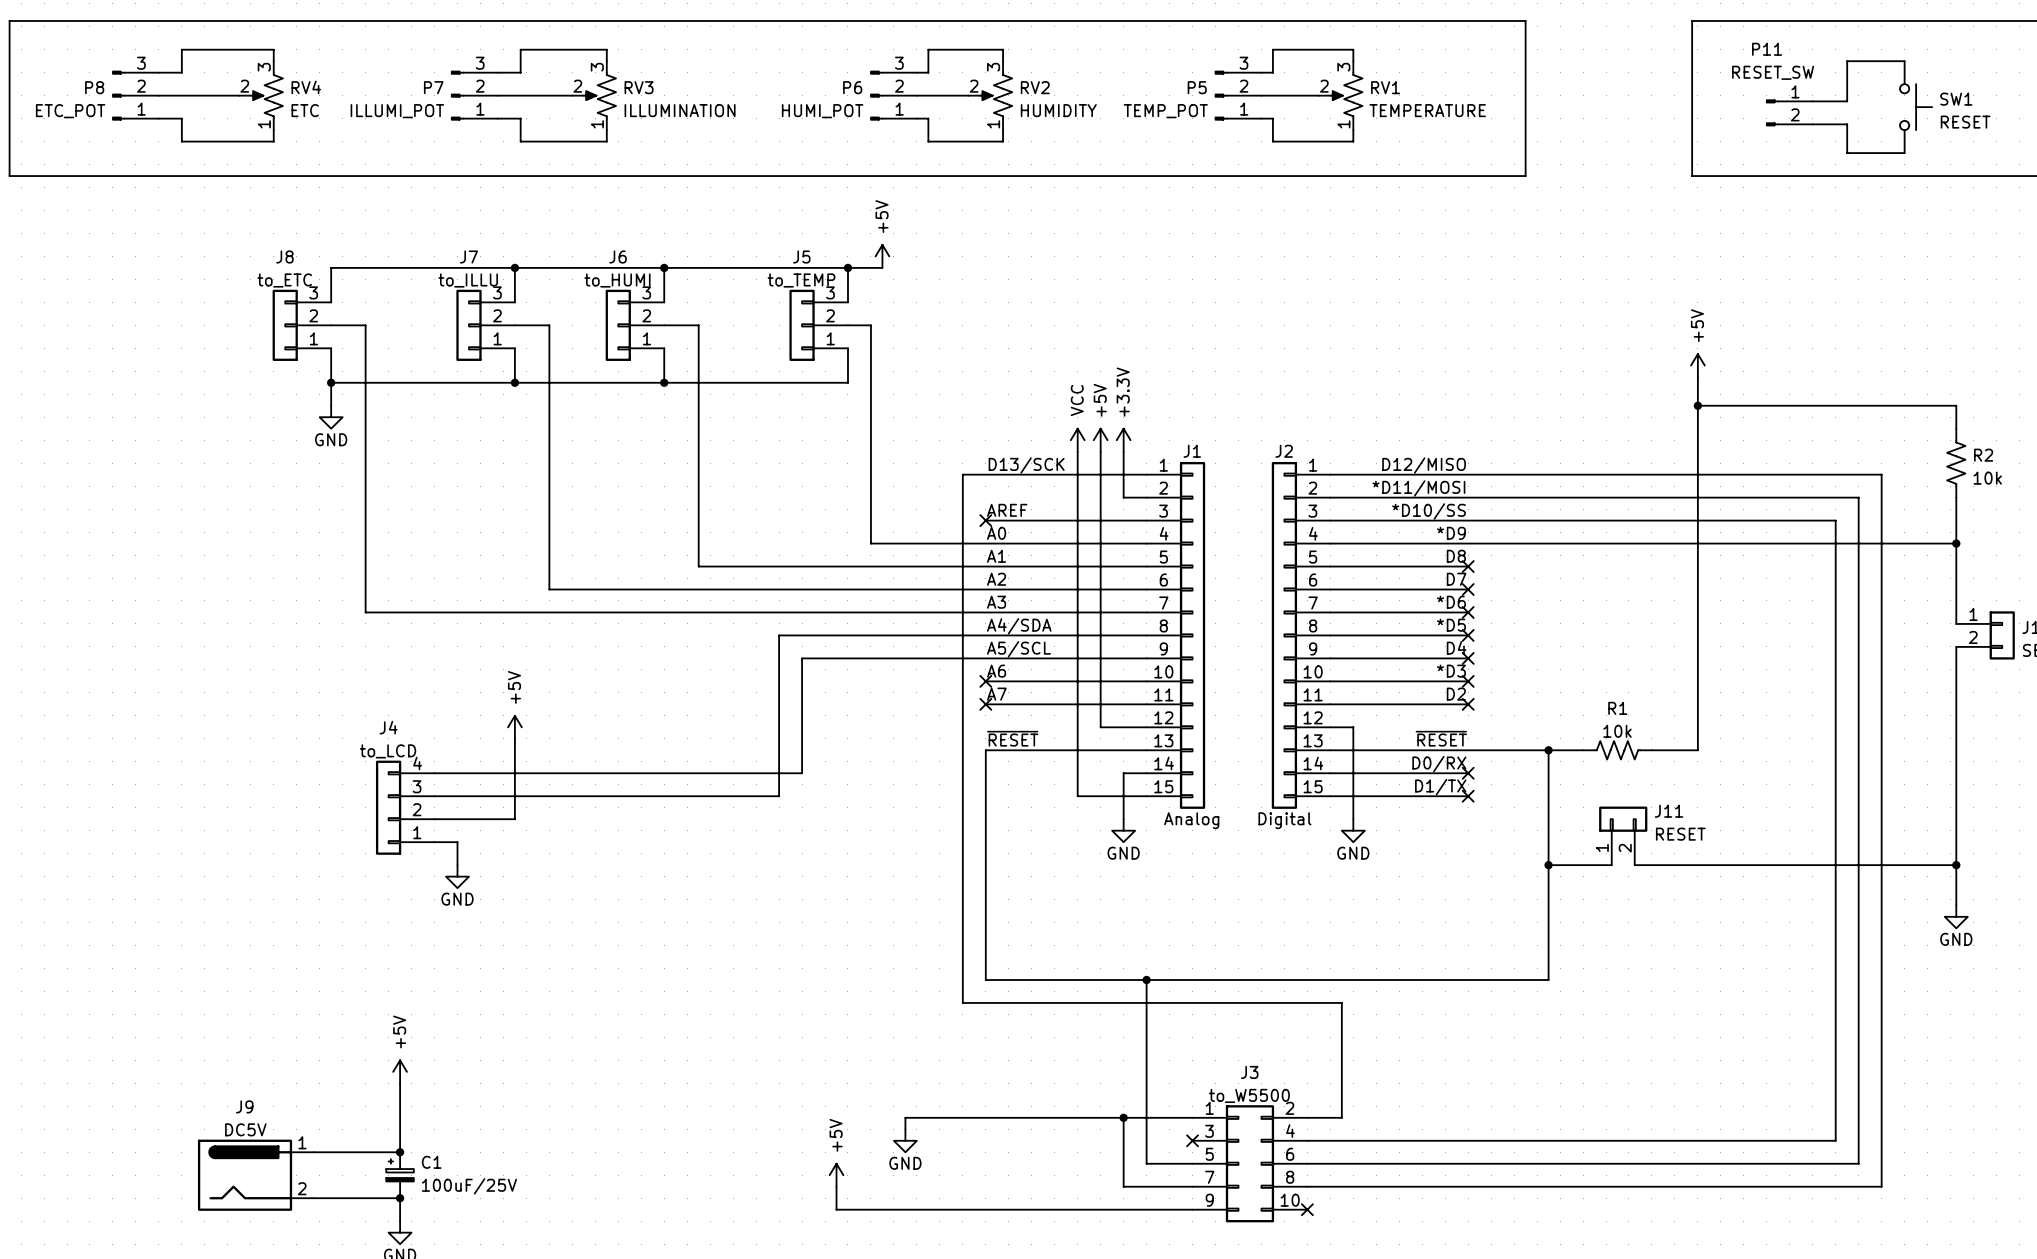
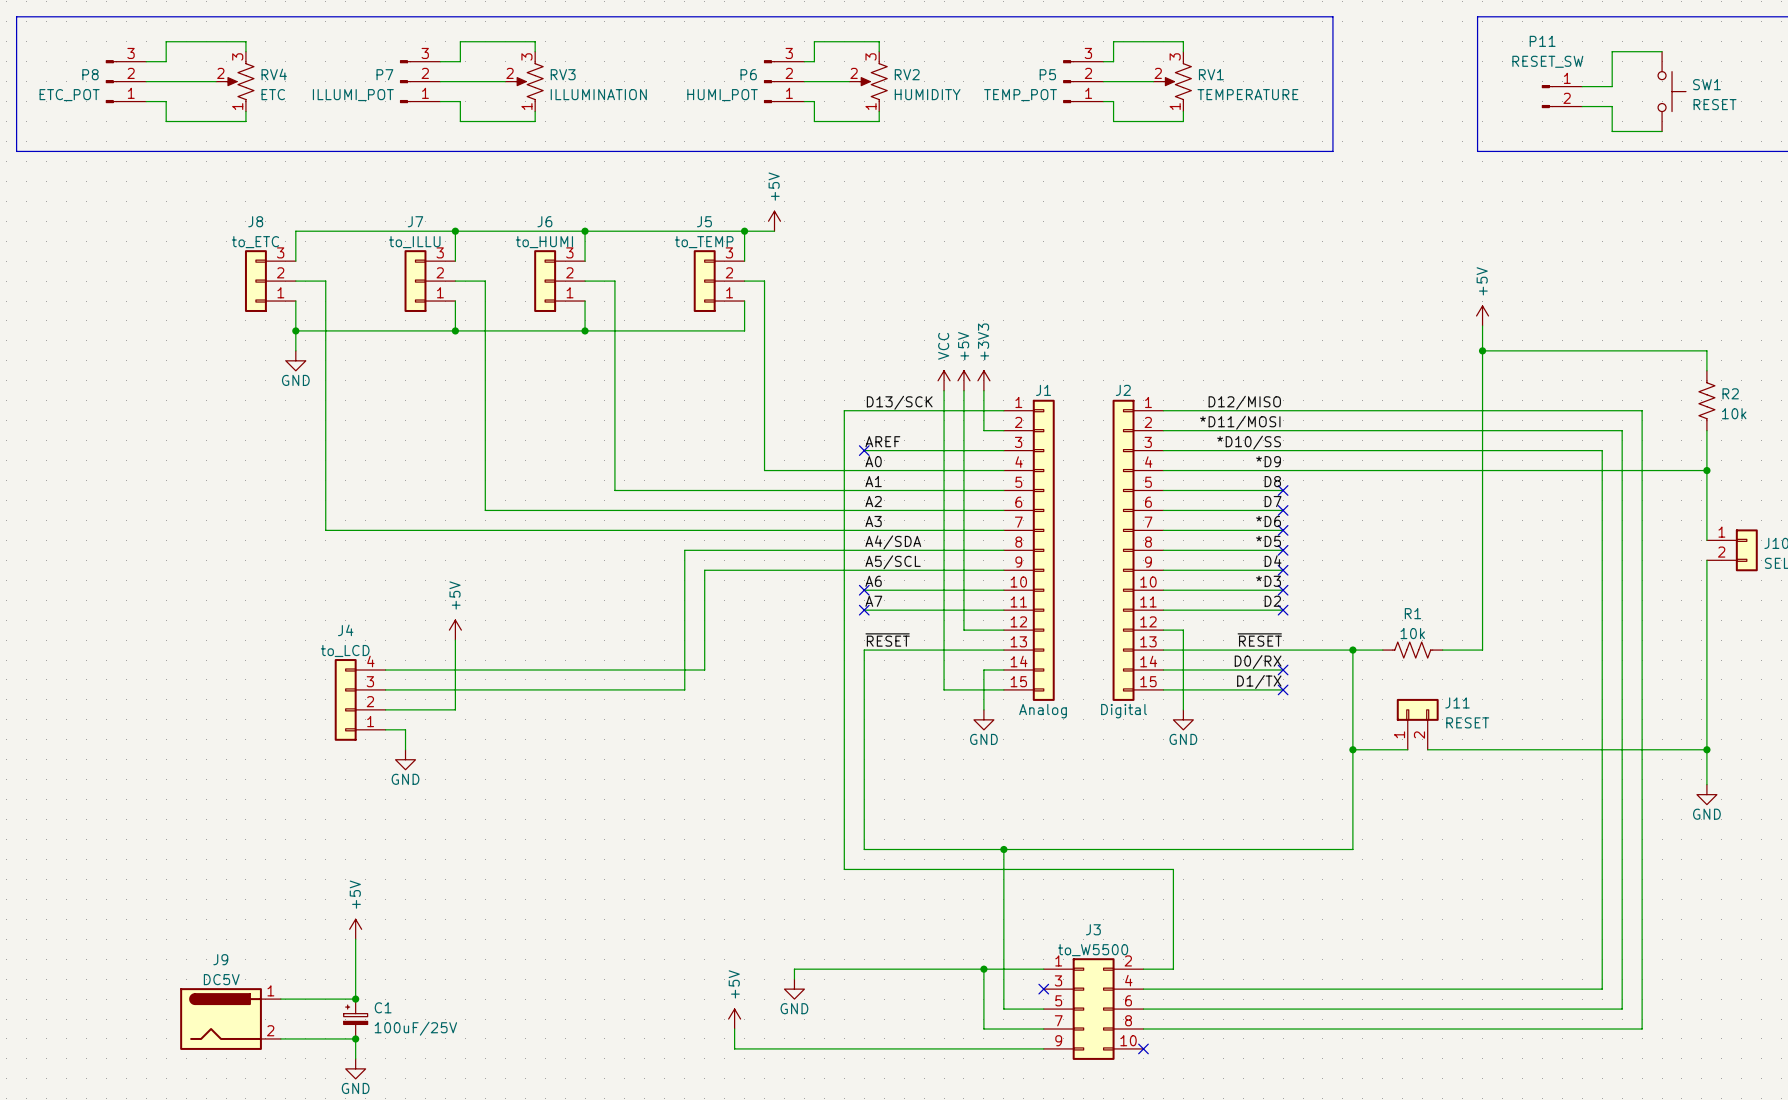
power symbol: +3.3V (1123, 440) -> +3V3 (983, 380)

